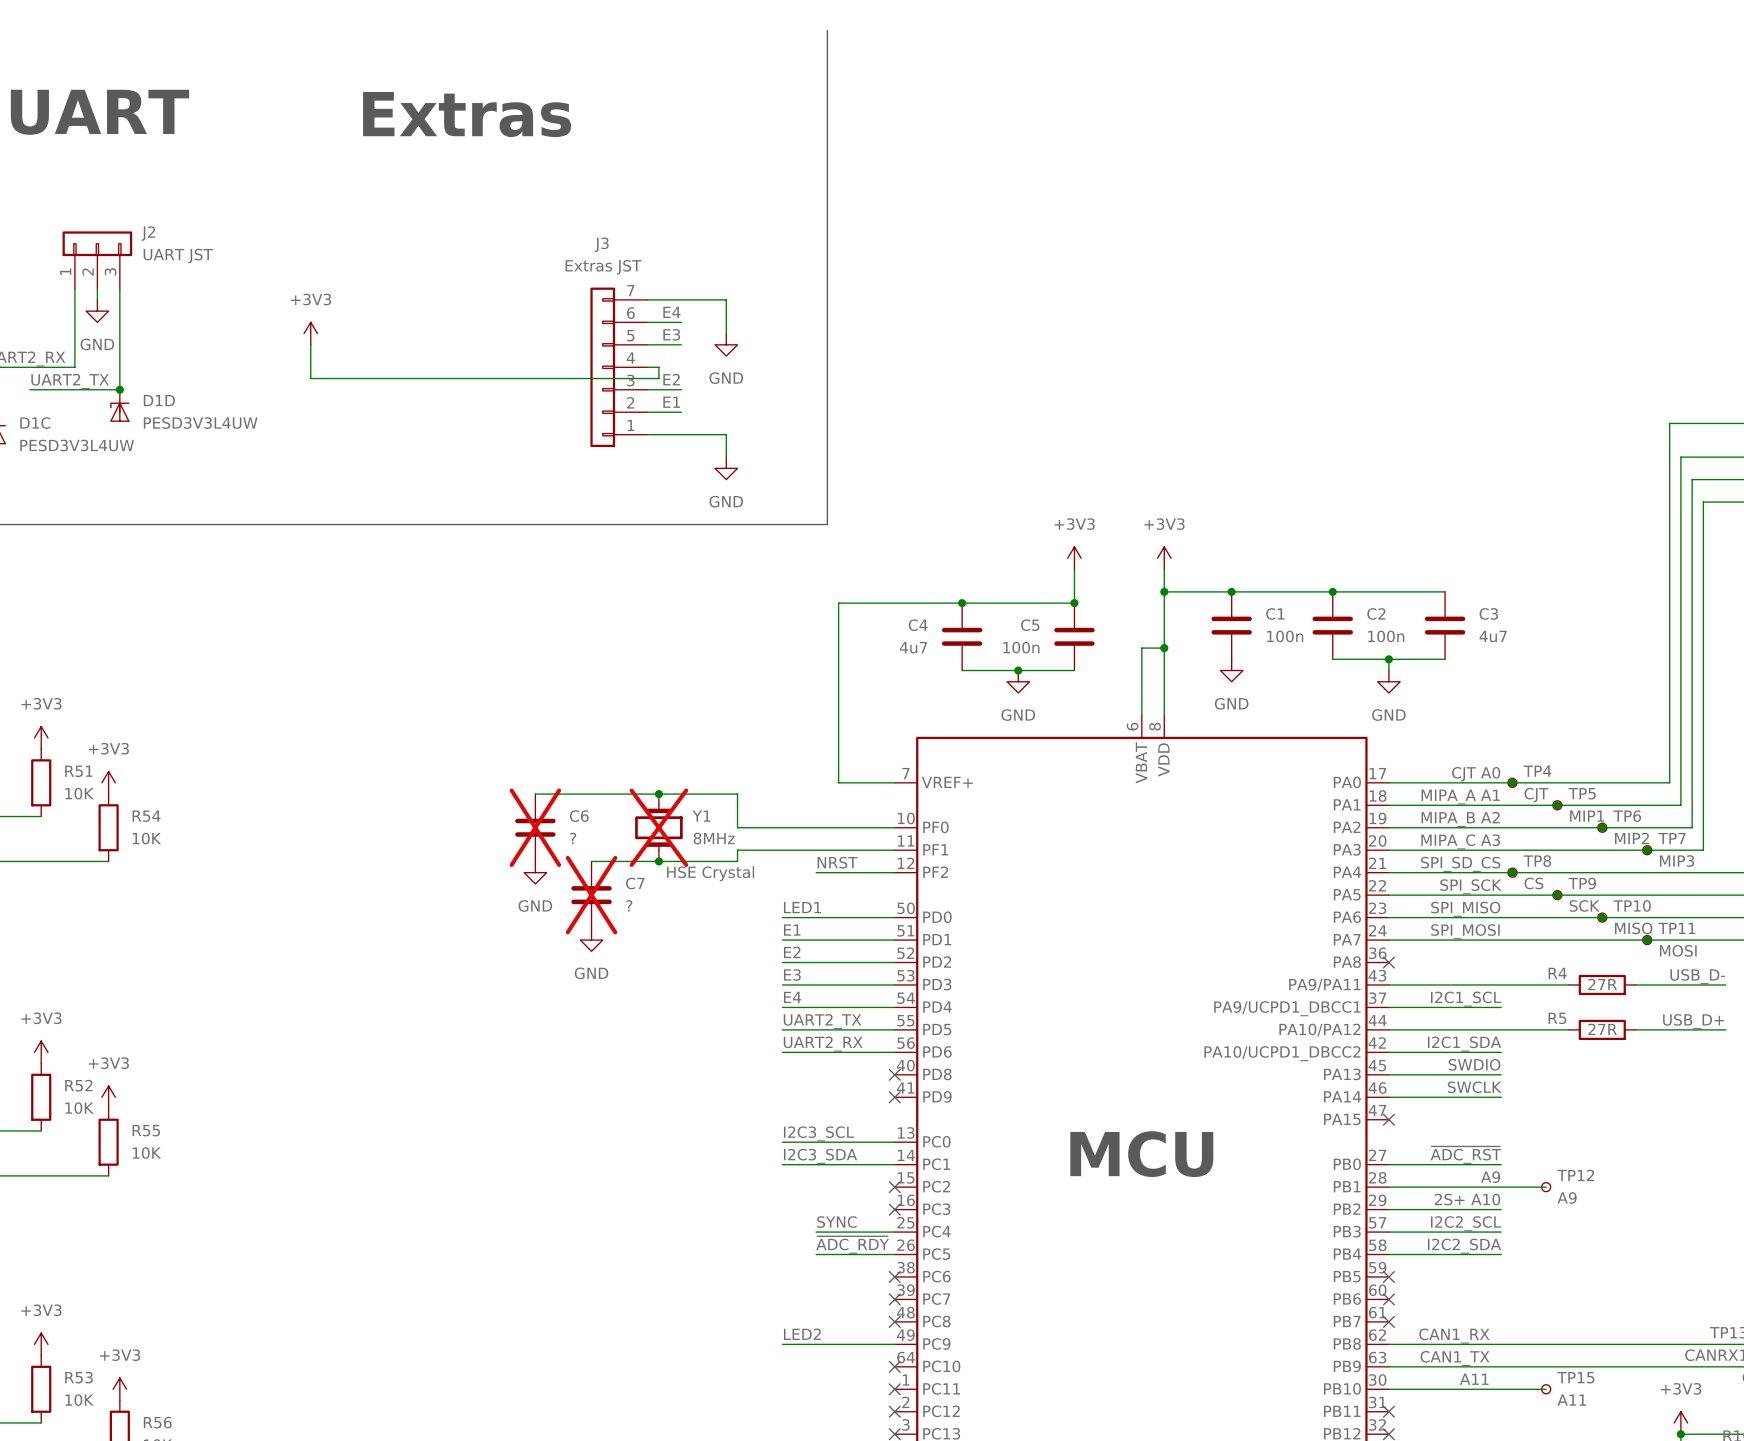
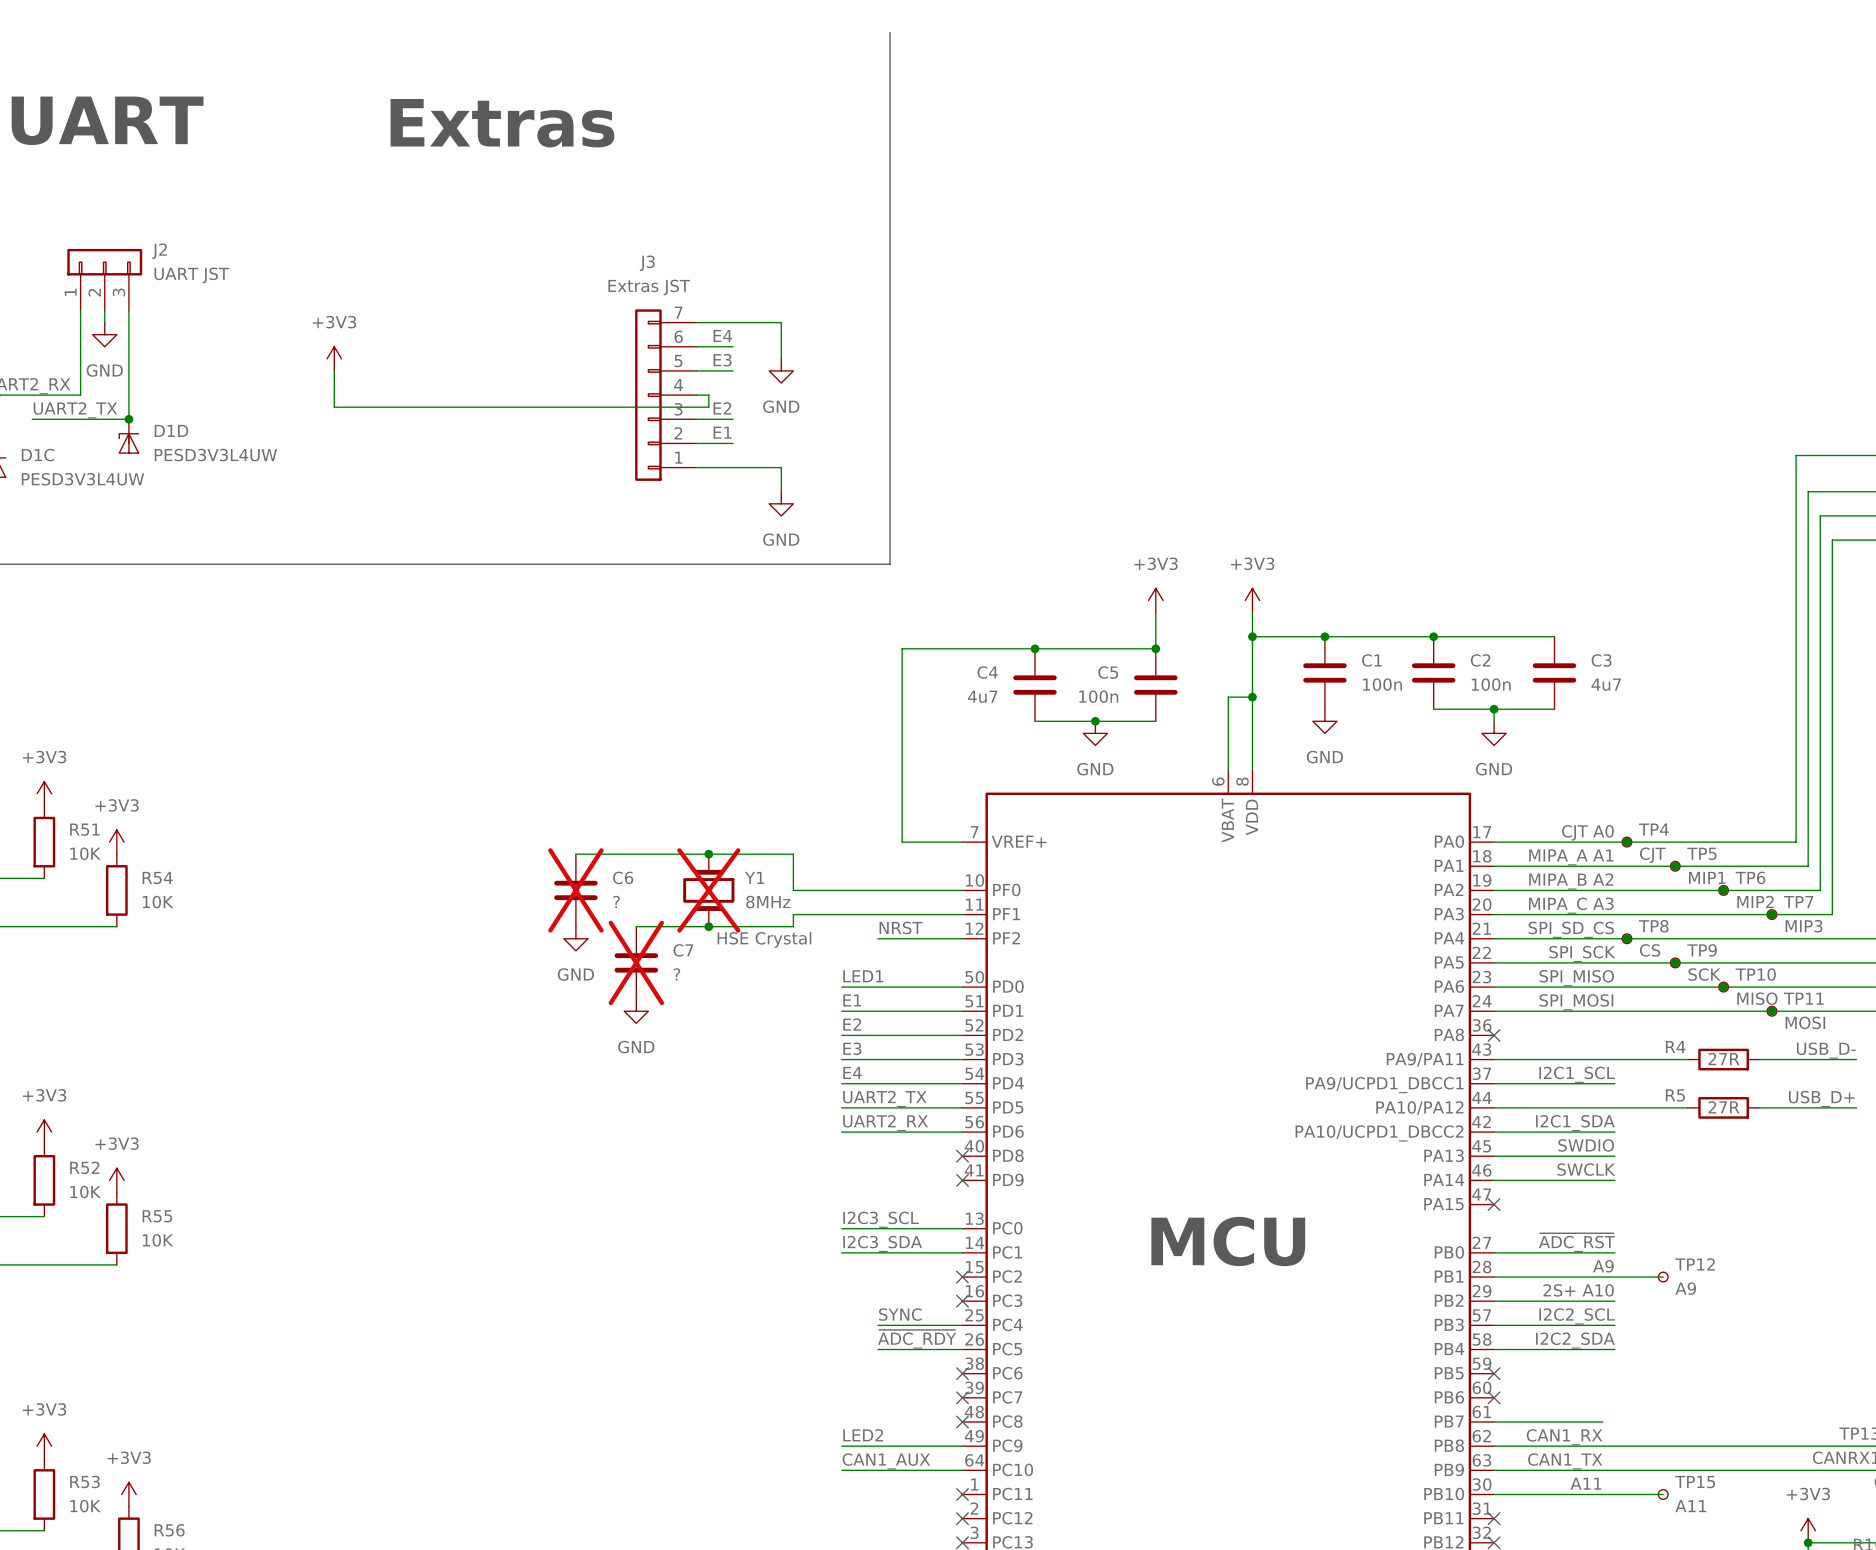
wire: none -> (1494, 1421) (1602, 1421)
no-connect mark: (1388, 1321) -> none
label: none -> CAN1_AUX (886, 1461)
wire: none -> (841, 1470) (962, 1470)
no-connect mark: (894, 1366) -> none

